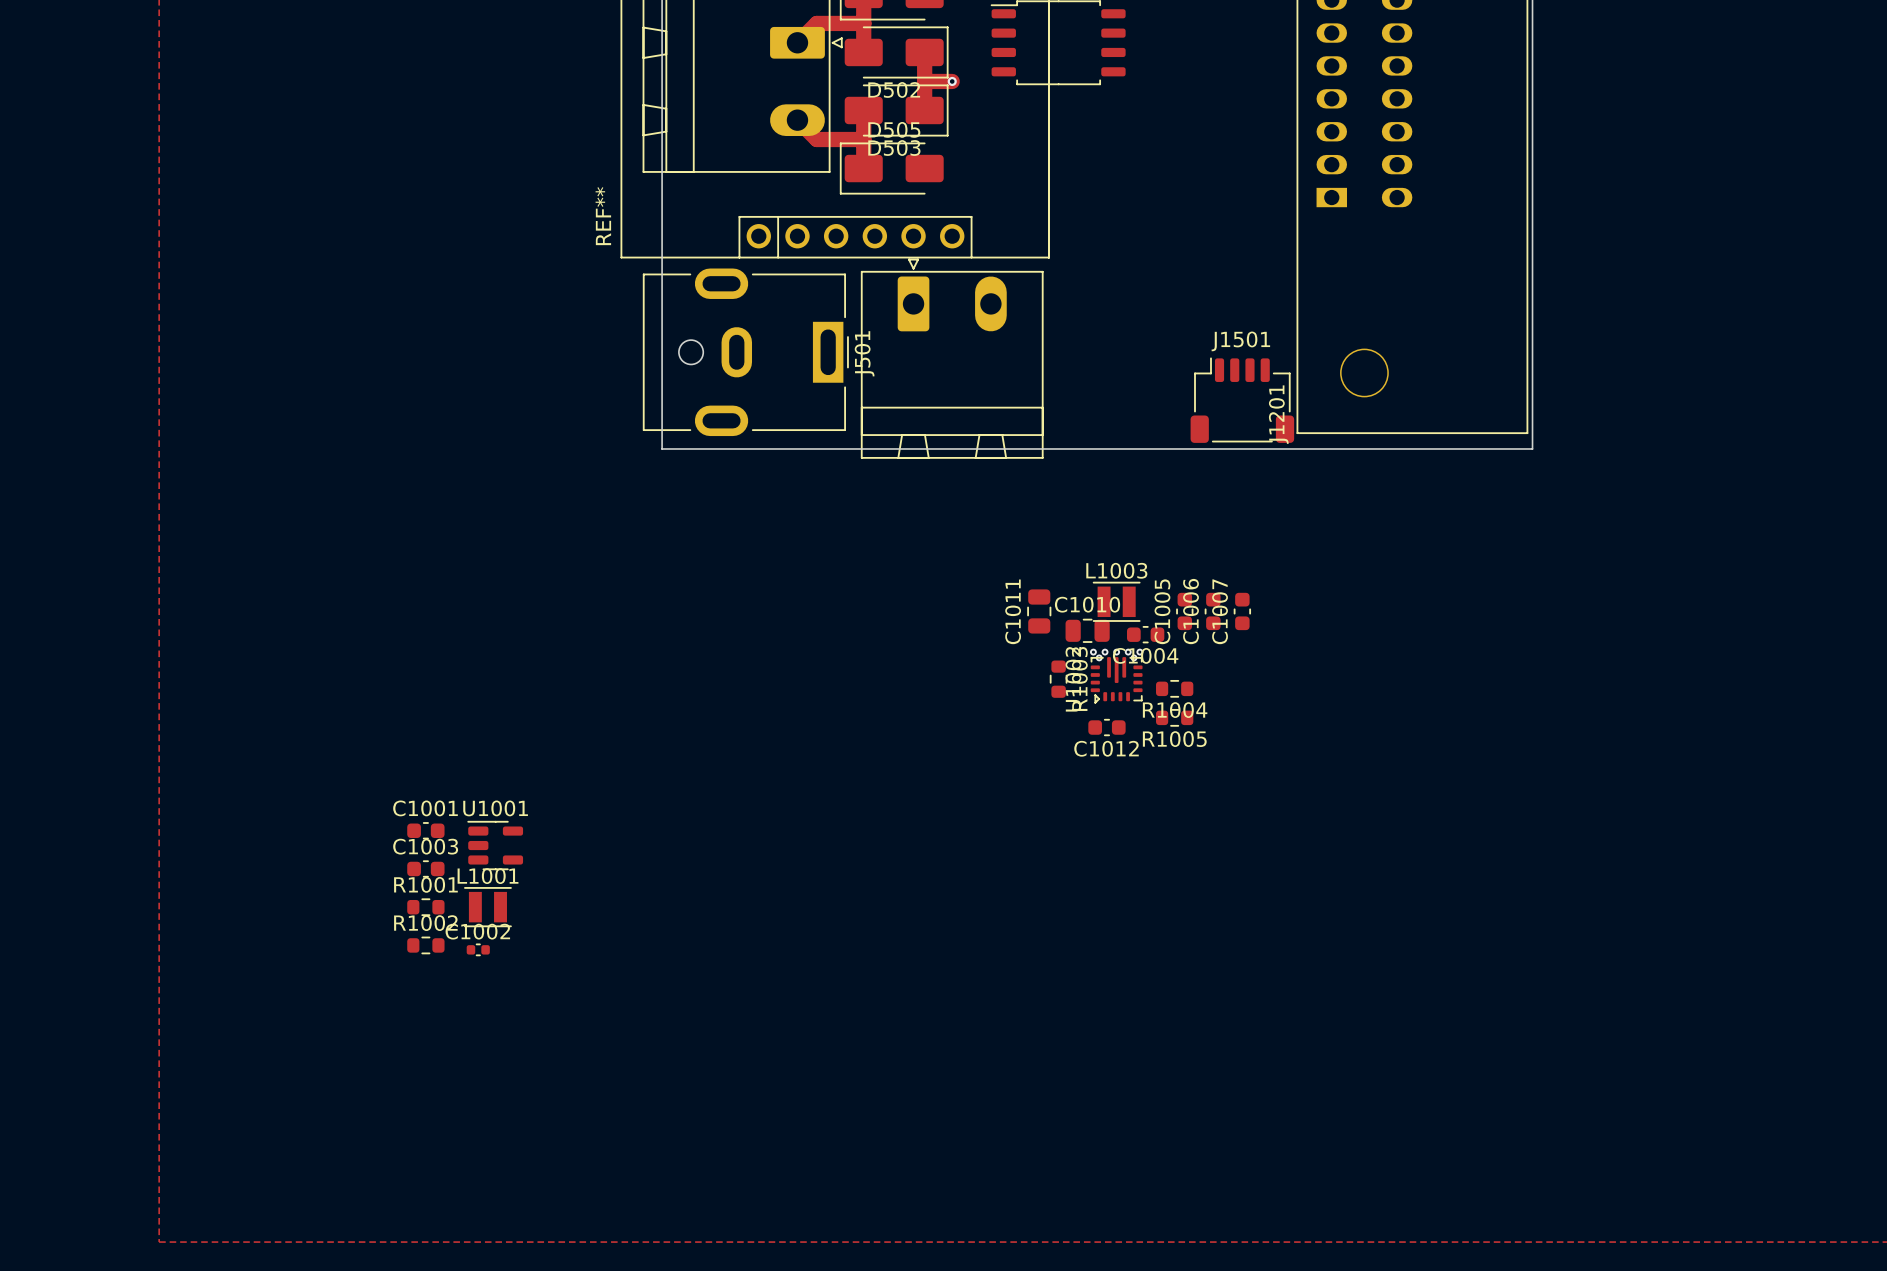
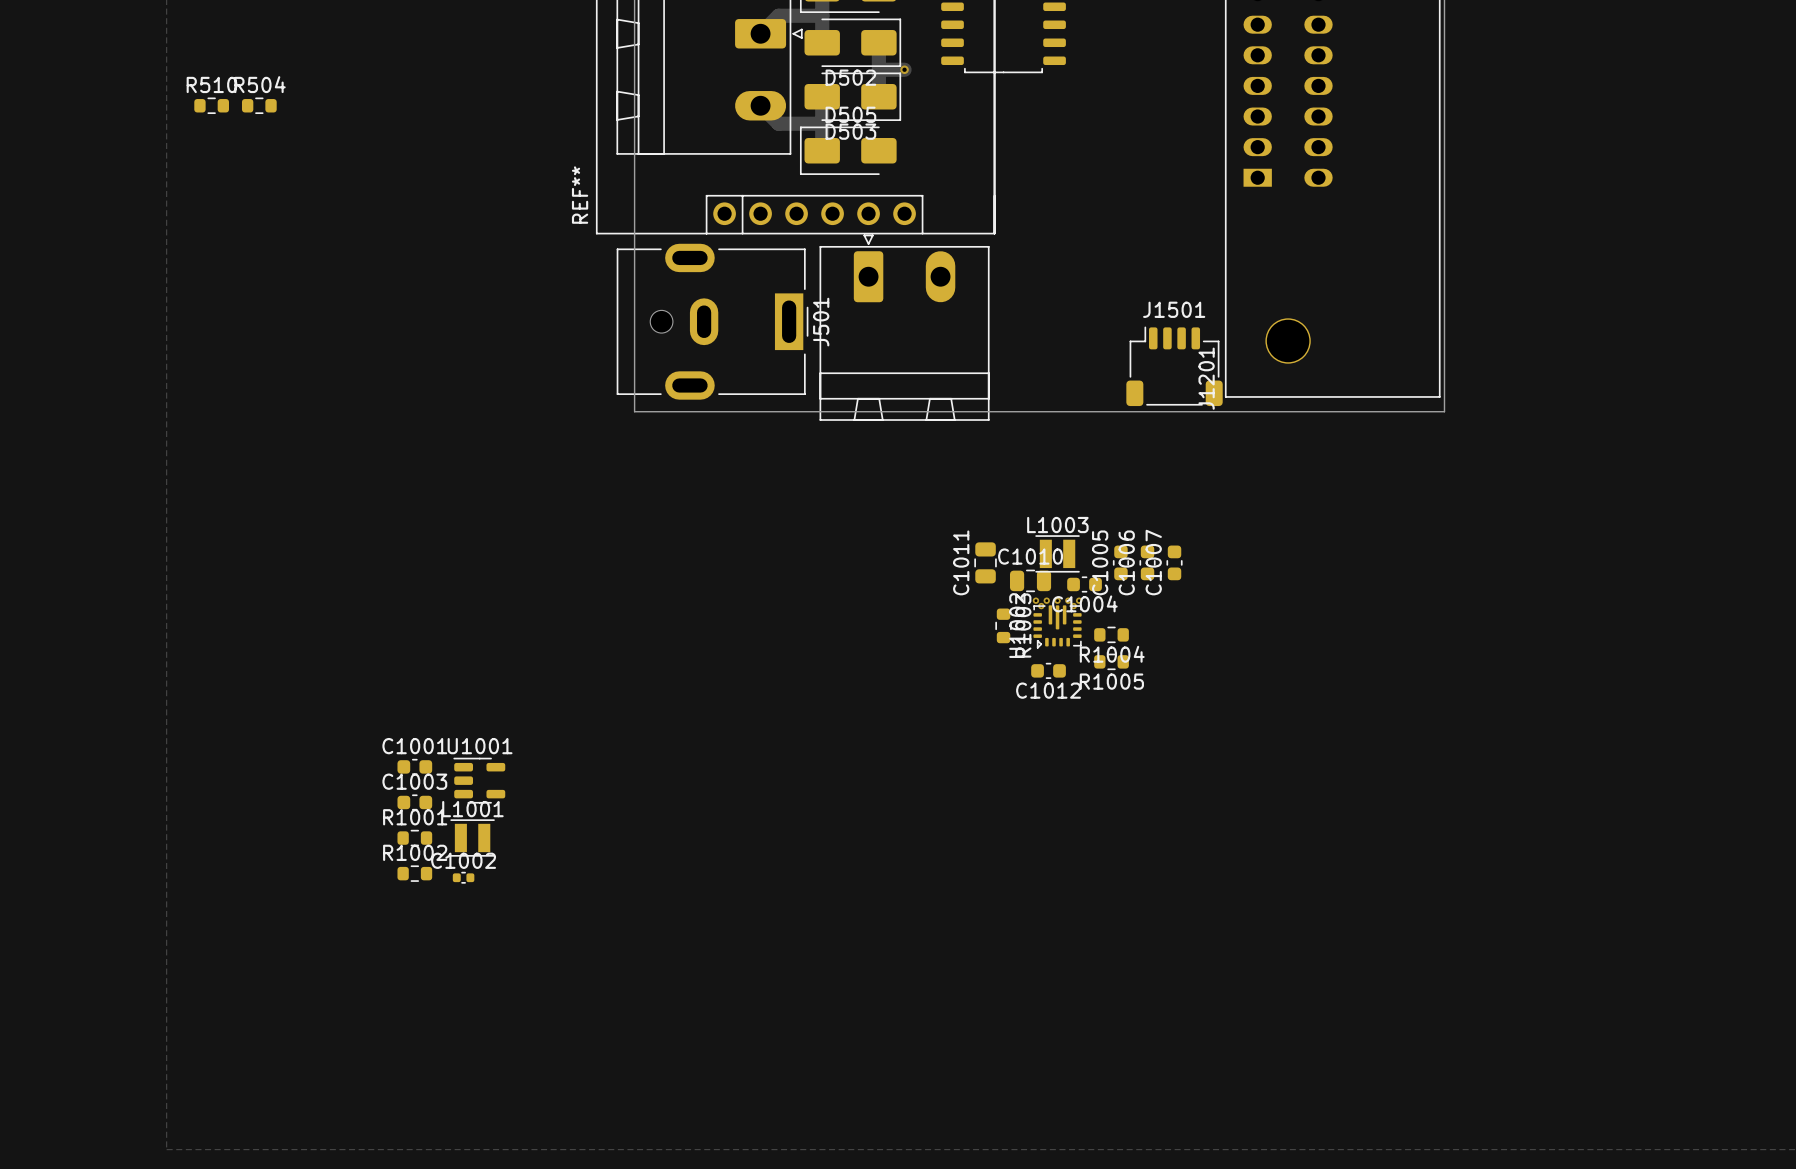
R510: none -> (211, 105)
R504: none -> (259, 105)

